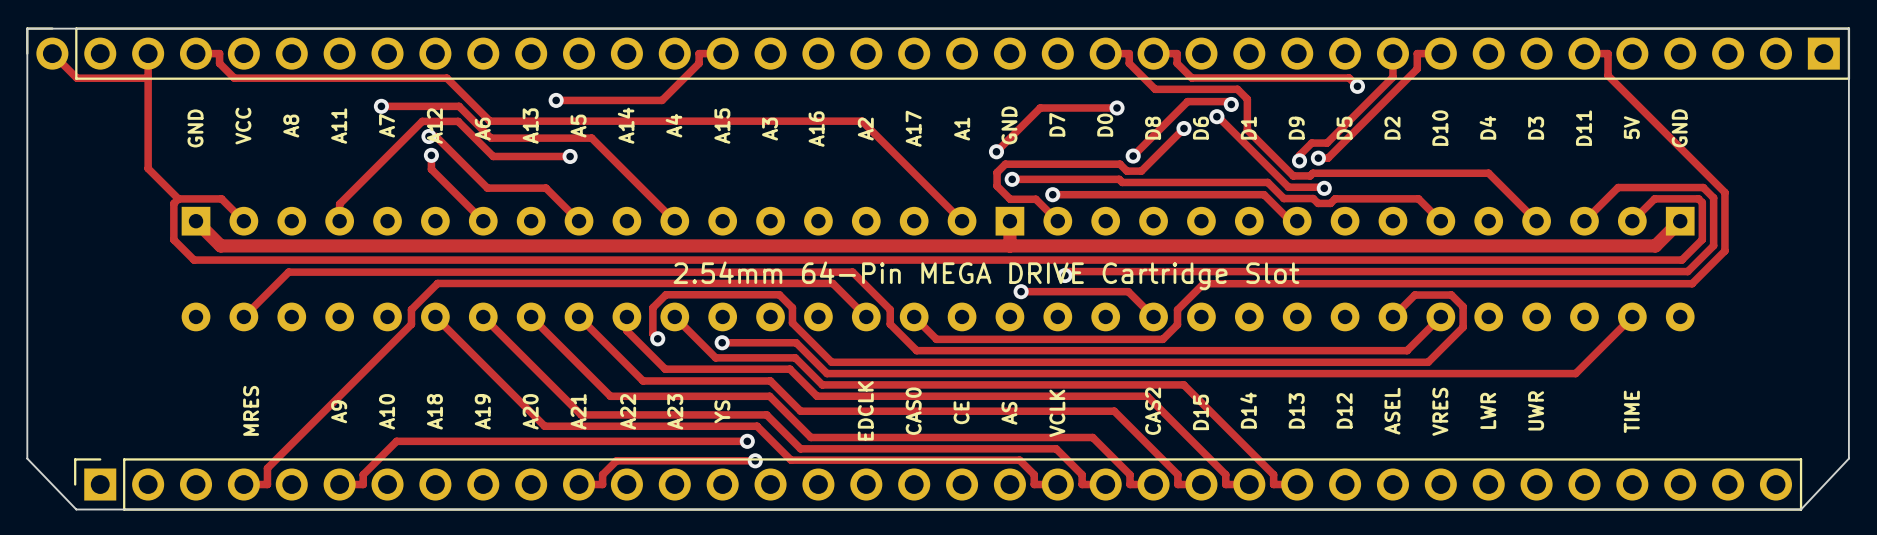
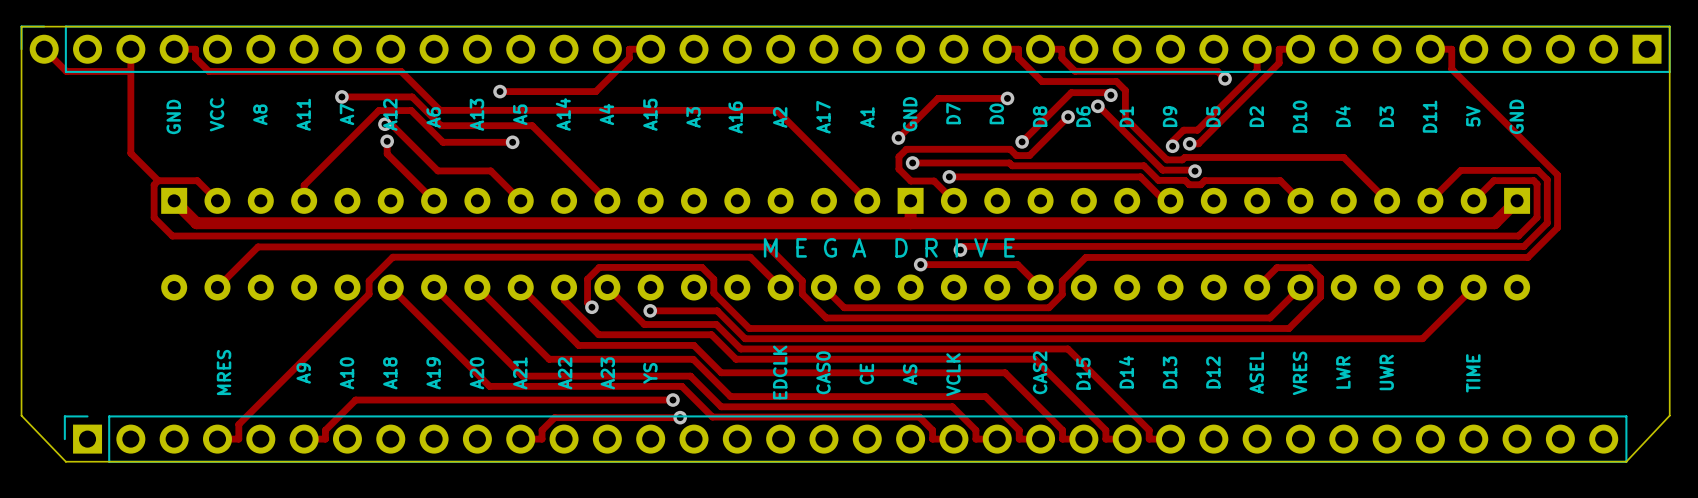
text: 2.54mm 64-Pin MEGA DRIVE Cartridge Slot (986, 275) -> M E G A D R I V E (889, 247)

